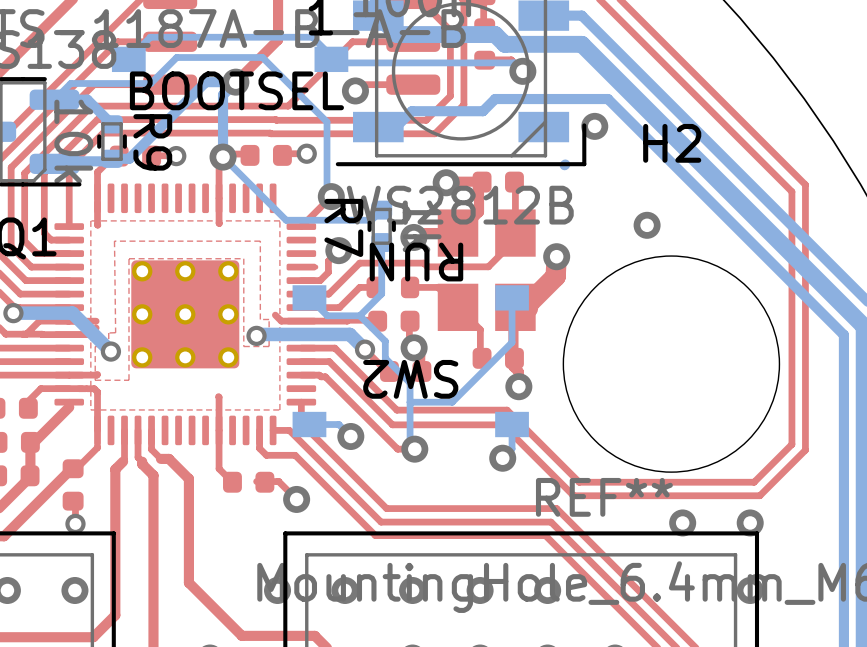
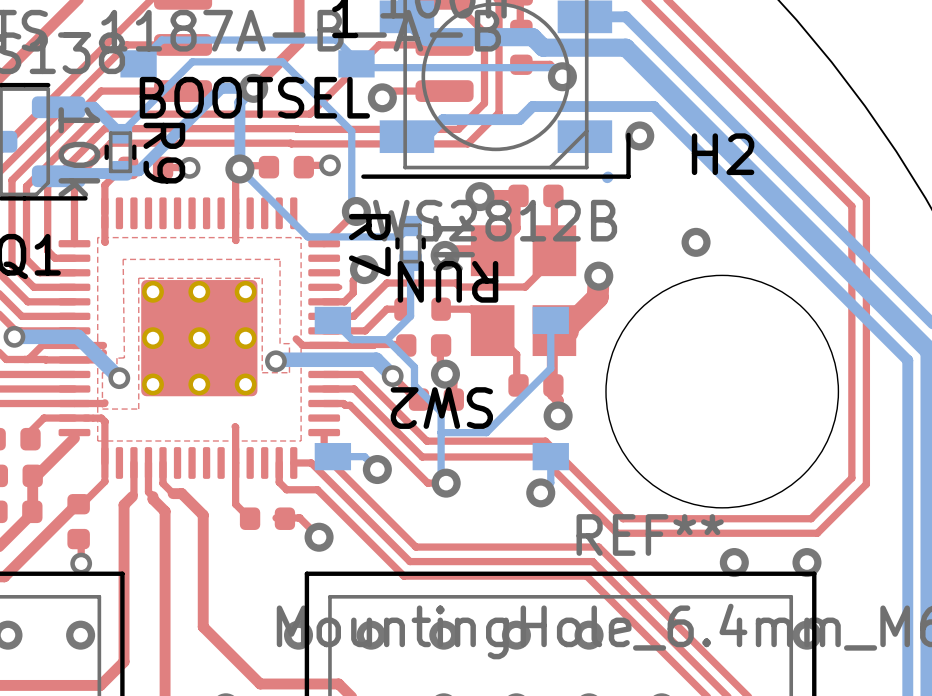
bottom track: (178, 57) (150, 83) (70, 83) (54, 99) -> (192, 61) (120, 133)

